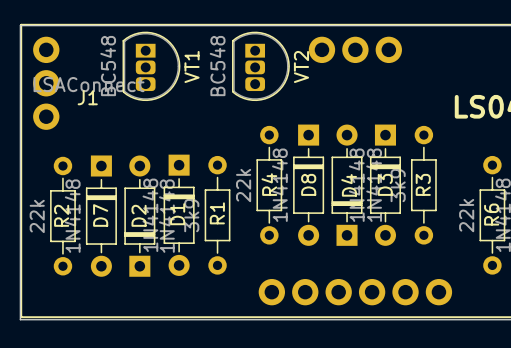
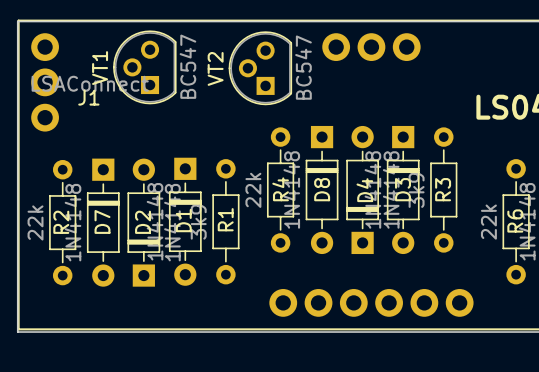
VT1 footprint: [122, 31, 181, 102] -> [113, 30, 177, 105]
VT2 footprint: [231, 31, 290, 102] -> [228, 31, 293, 106]
VT1 value: BC548 (108, 66) -> BC547 (187, 66)
VT1 name position: VT1 (192, 66) -> VT1 (100, 68)
VT2 value: BC548 (217, 66) -> BC547 (303, 67)
VT2 name position: VT2 (301, 66) -> VT2 (215, 68)

